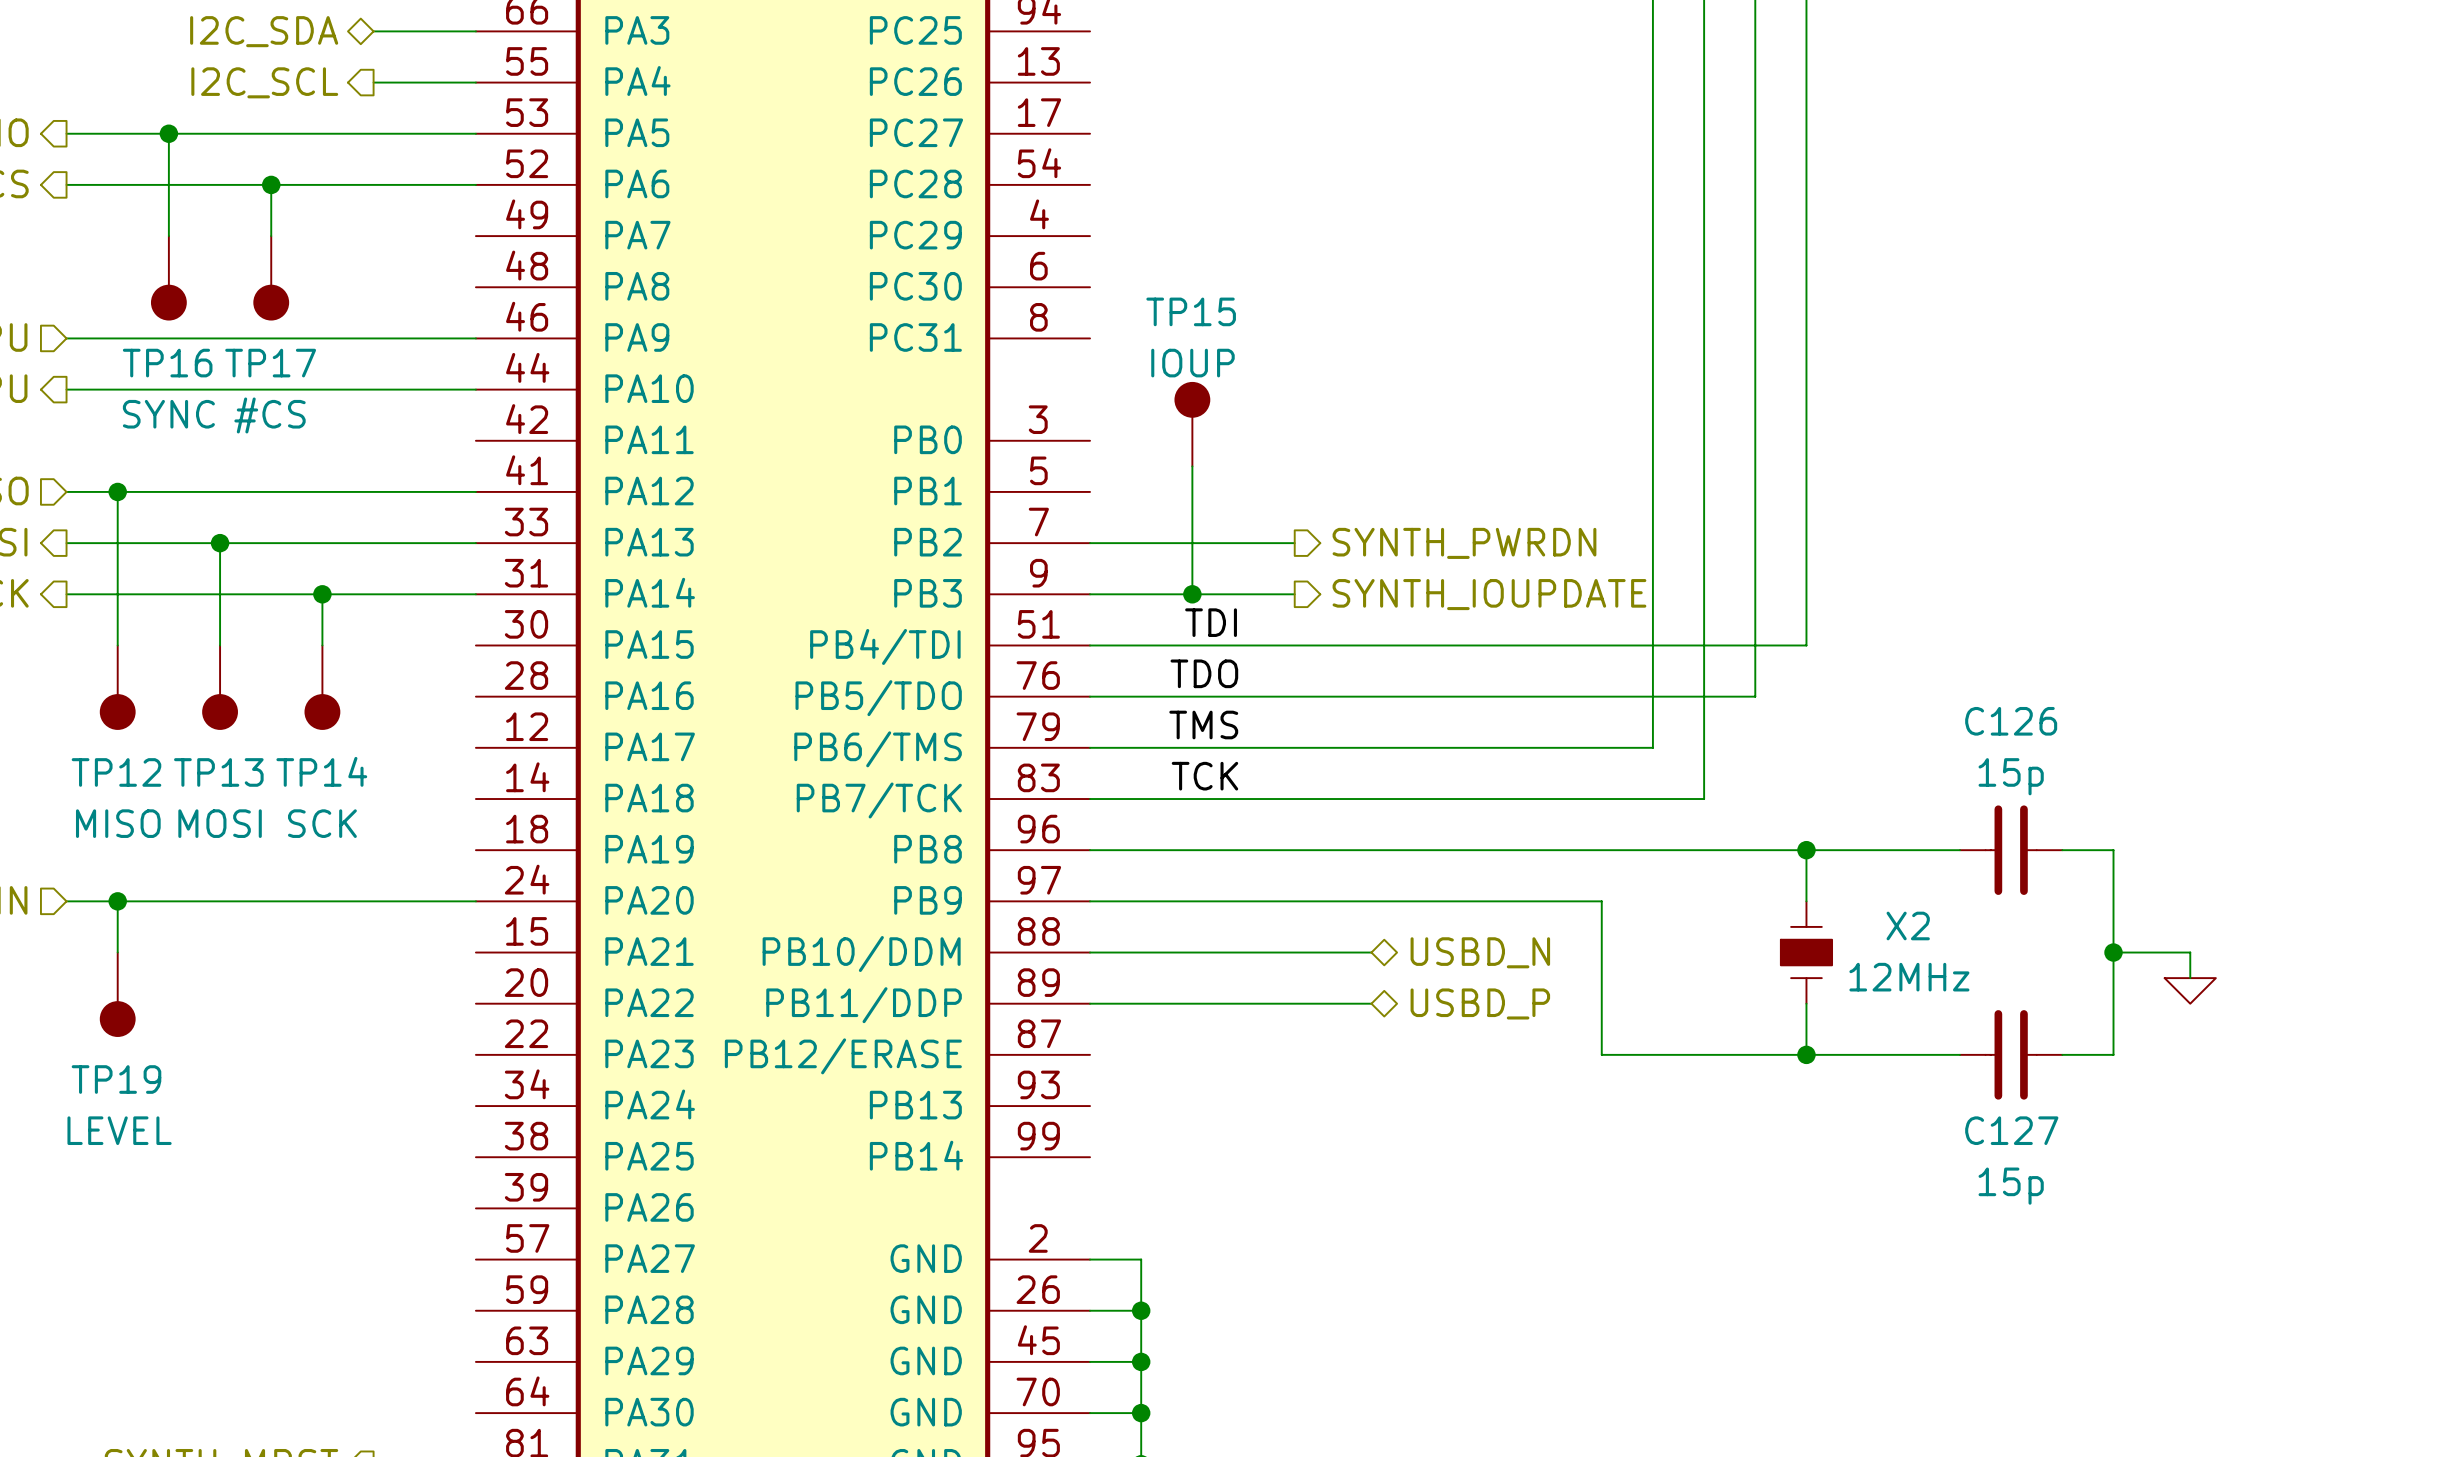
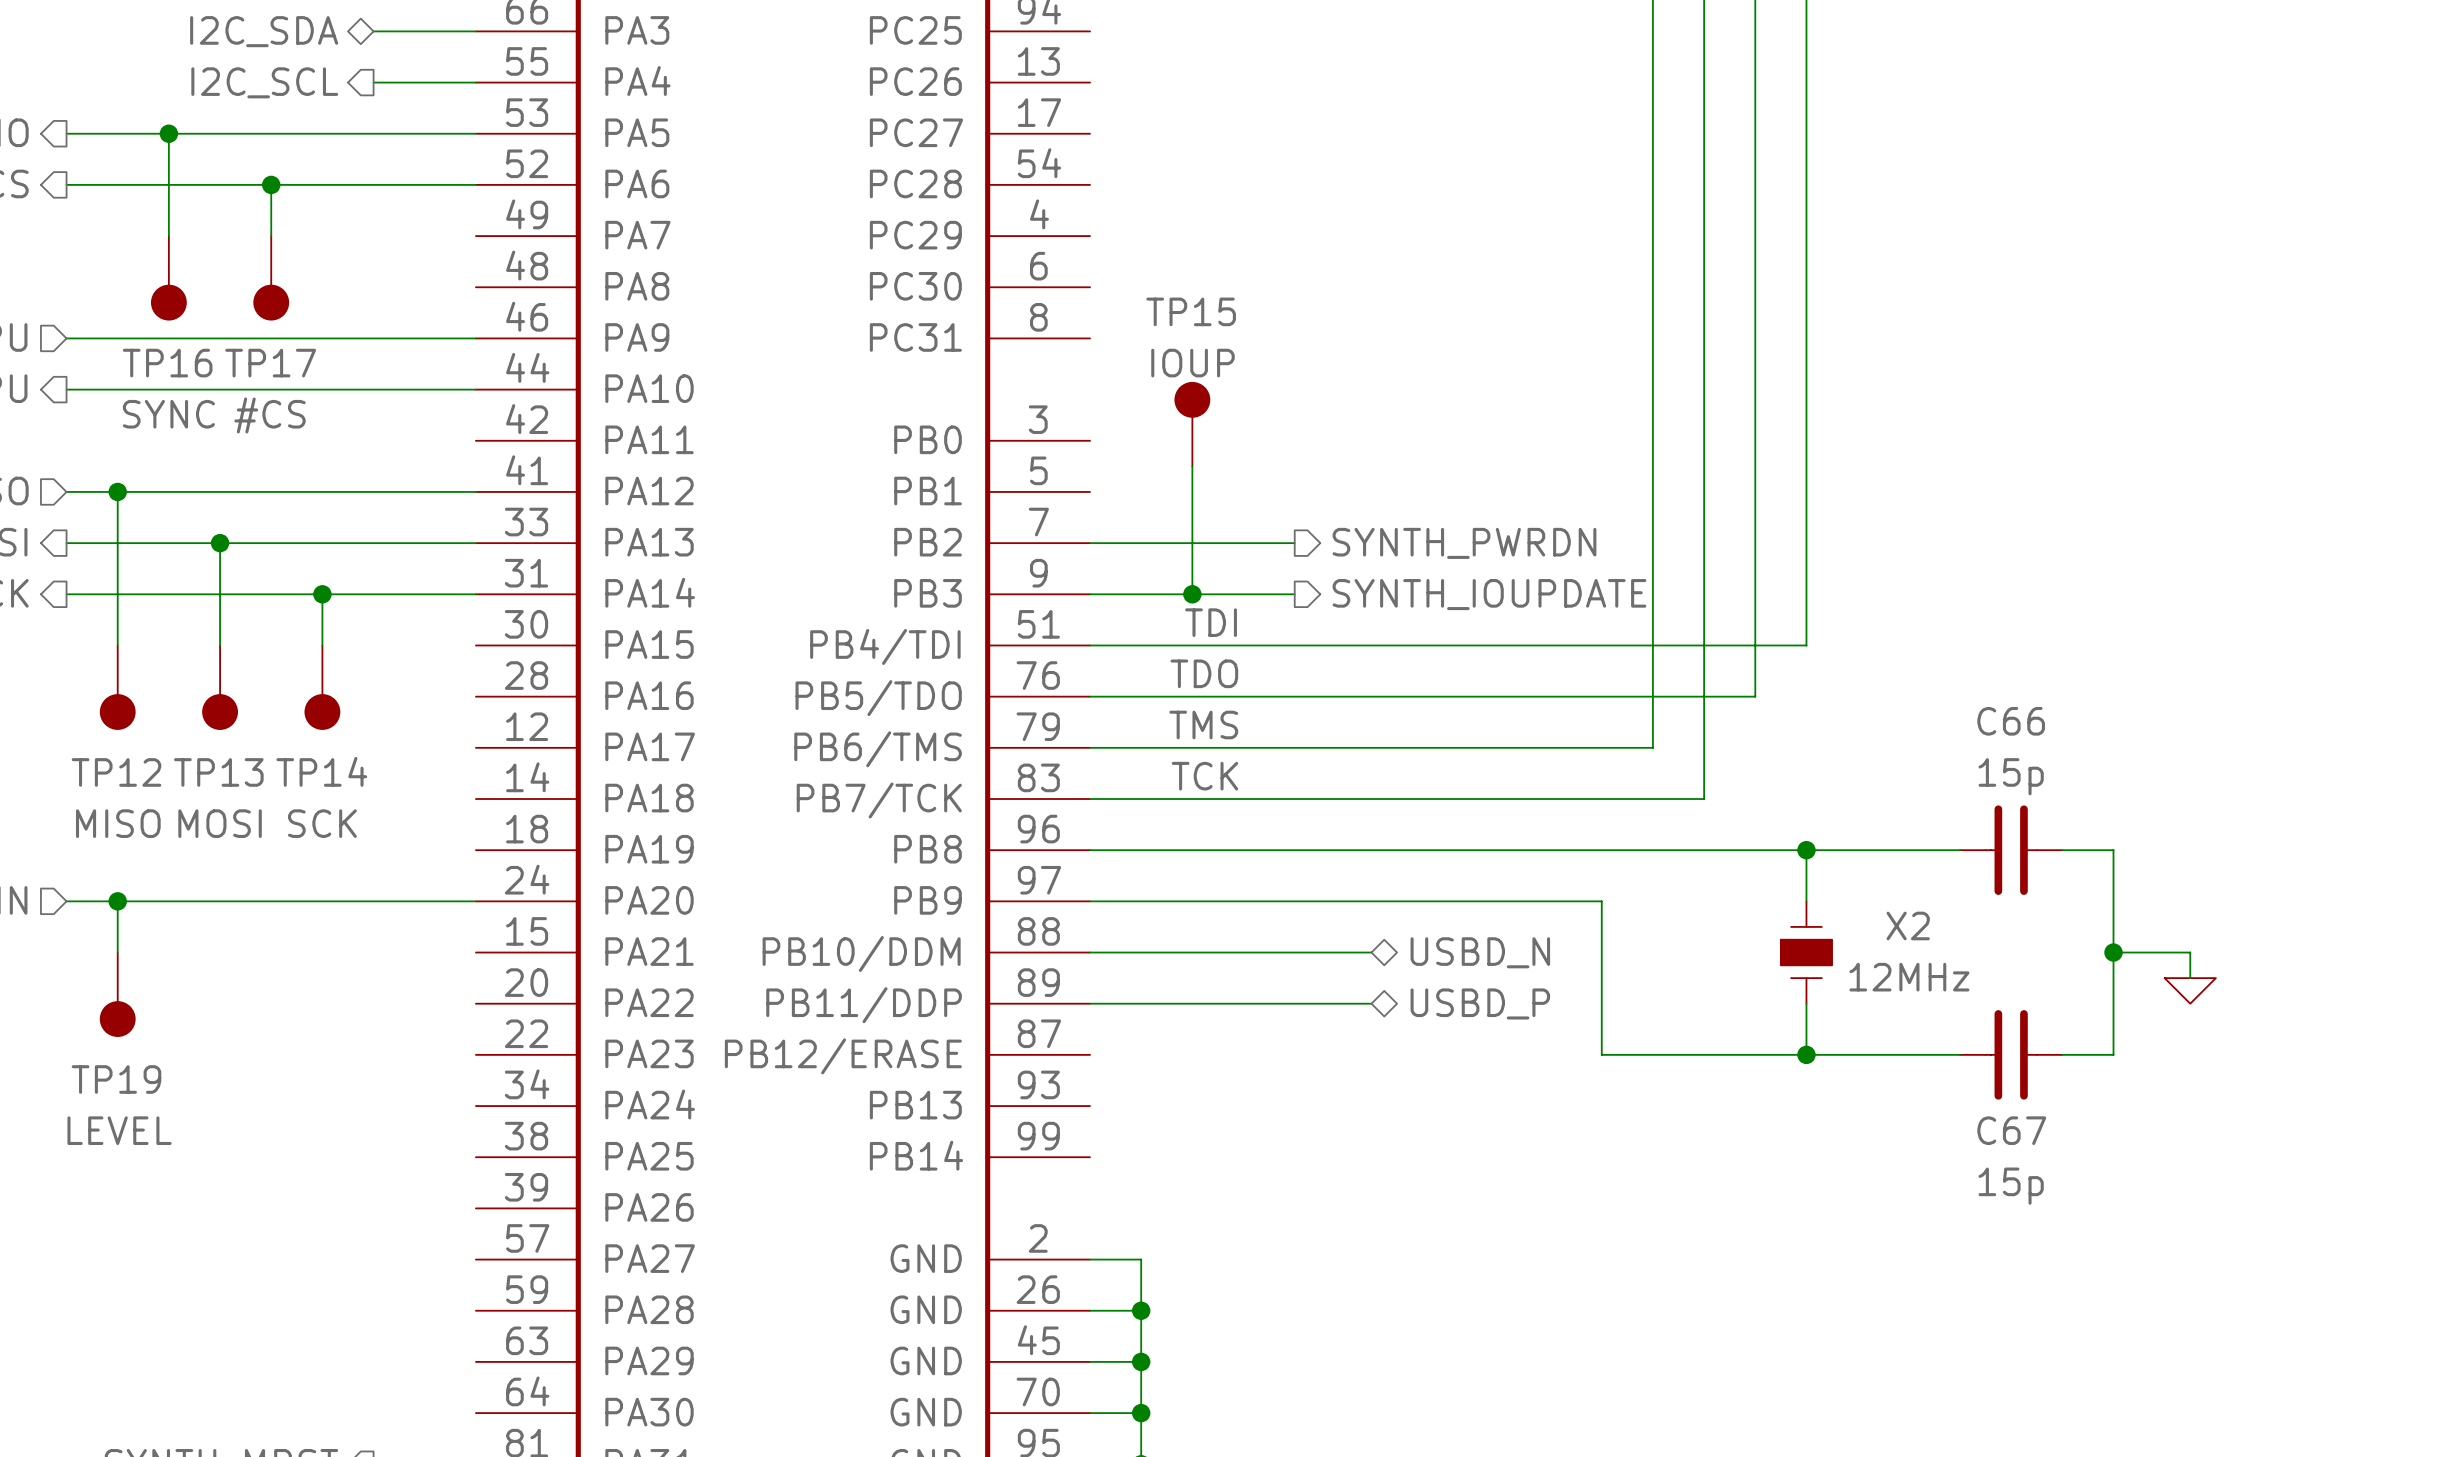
C126 name: C126 (2011, 721) -> C66 (2011, 721)
C127 name: C127 (2011, 1130) -> C67 (2011, 1130)

